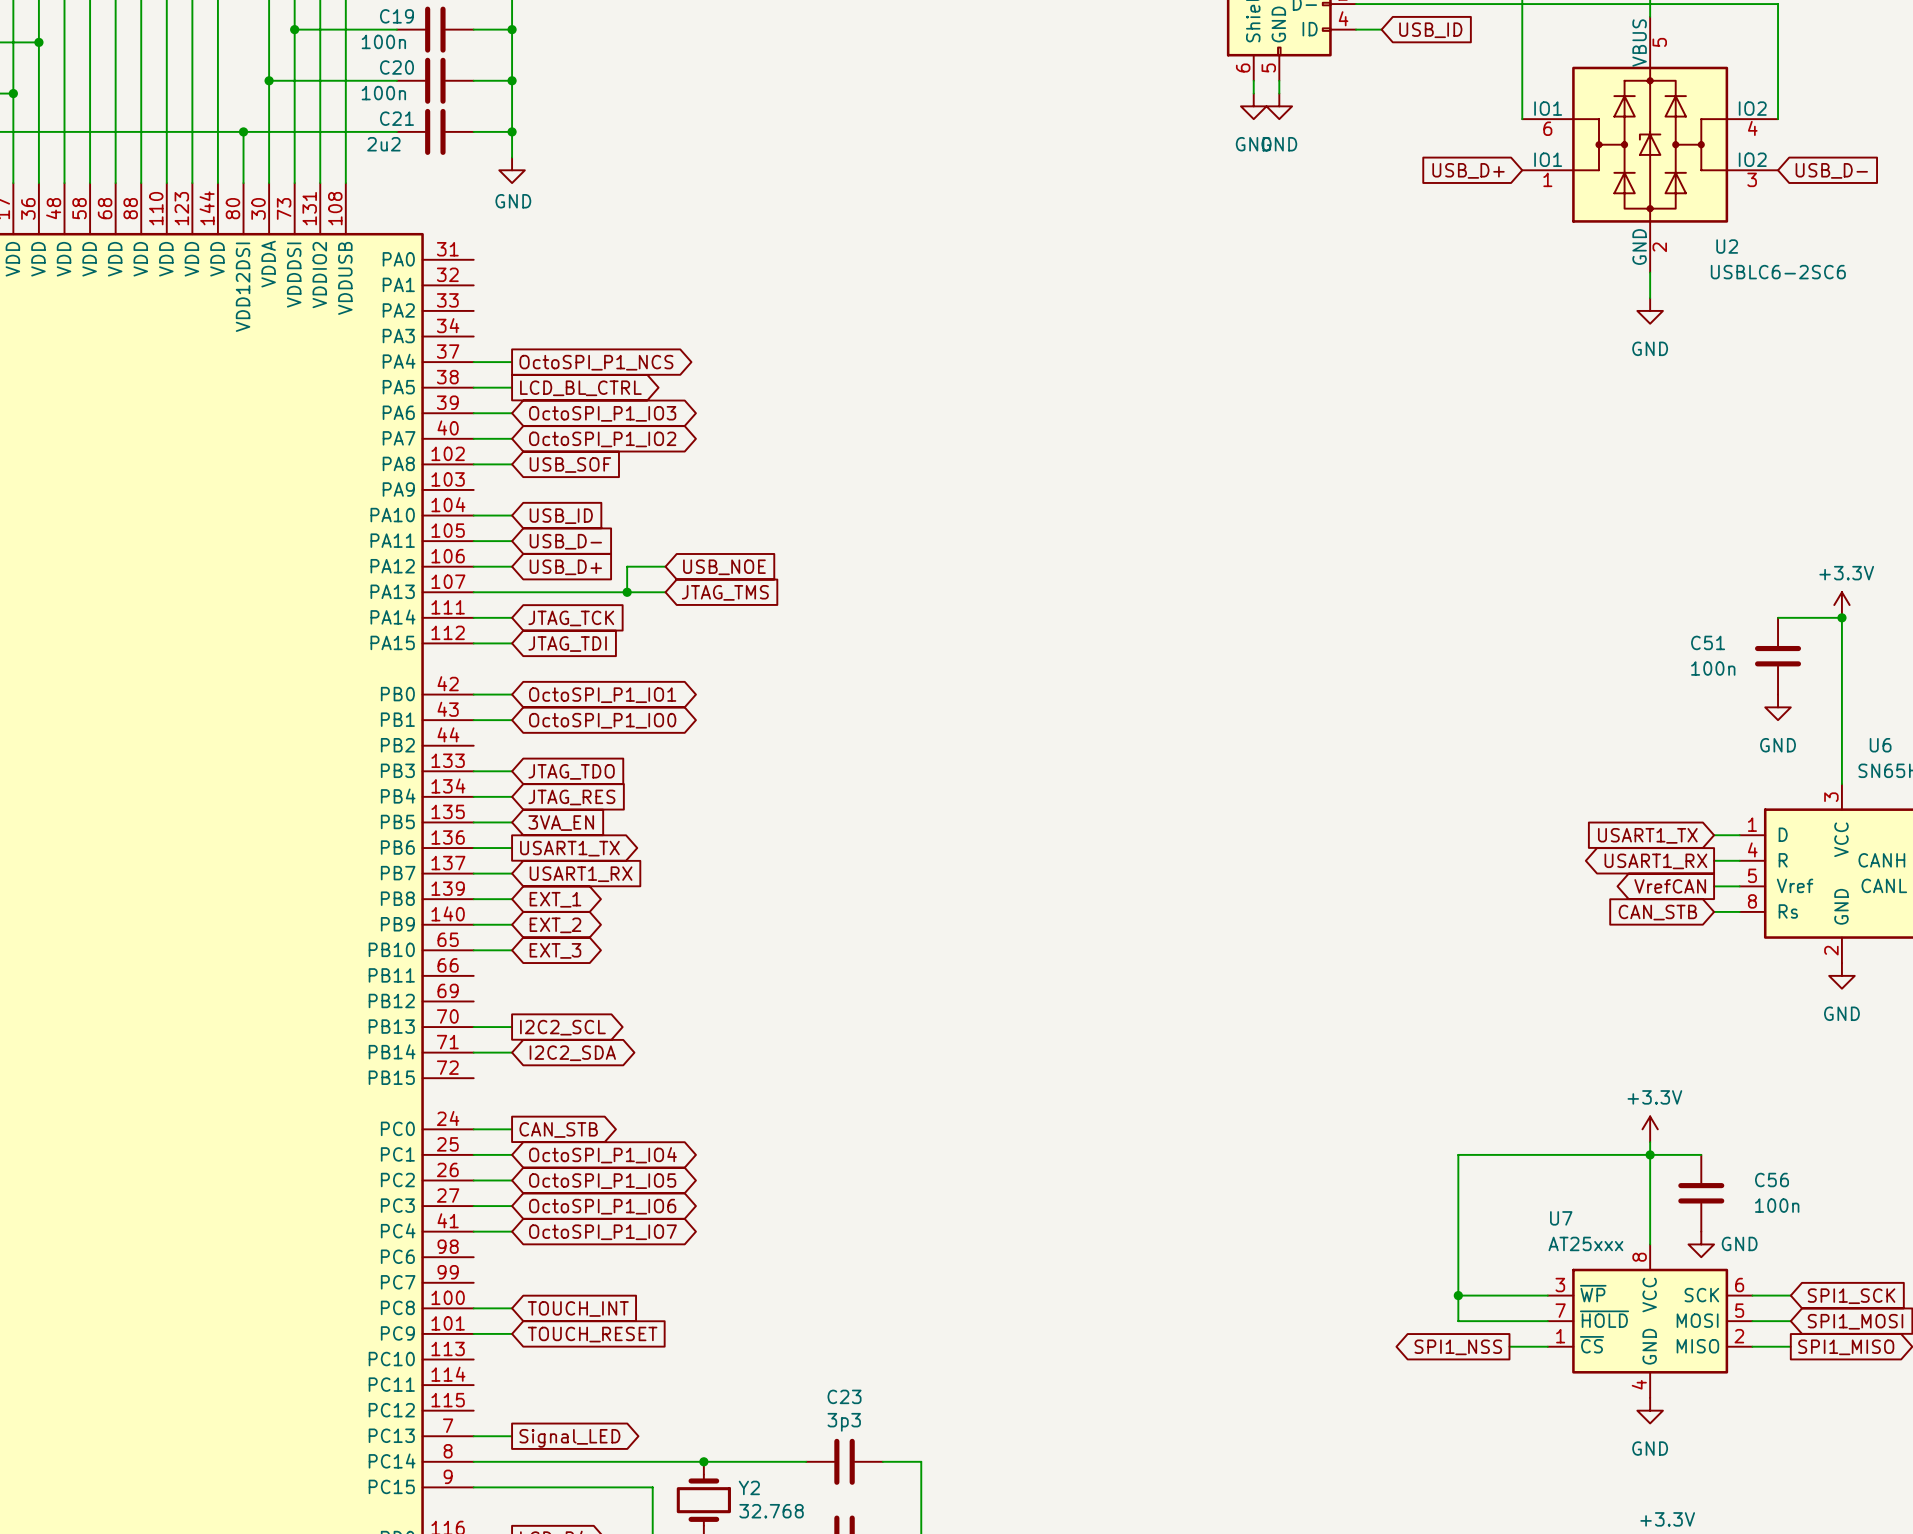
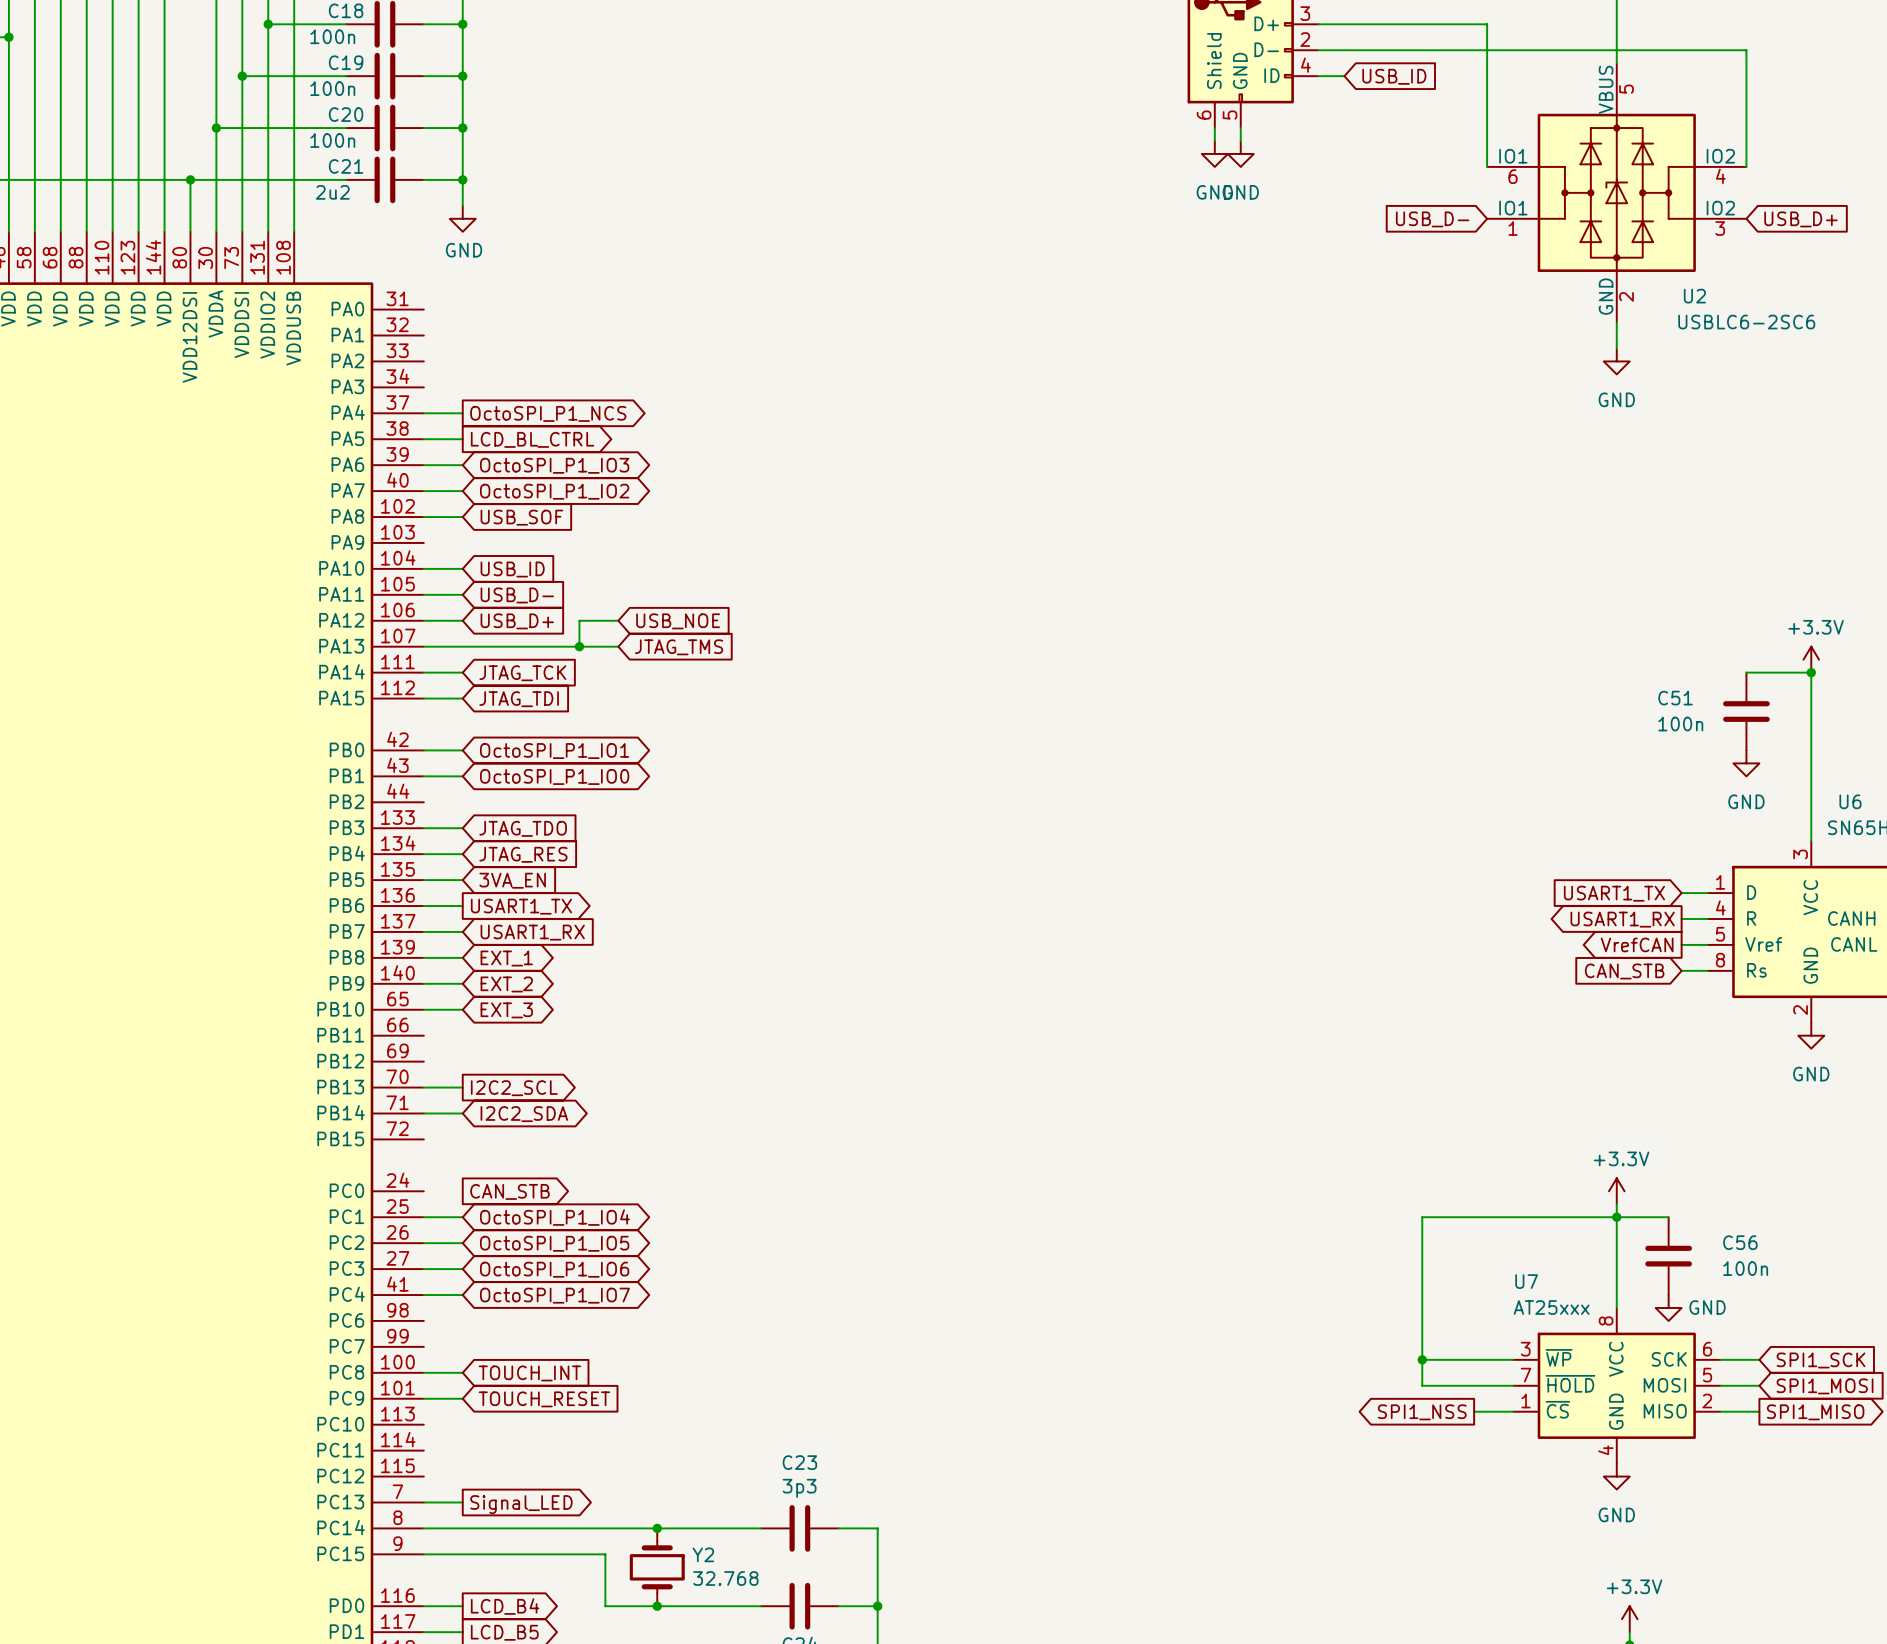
global label: USB_D+ (1468, 170) -> USB_D- (1432, 219)
global label: USB_D- (1831, 170) -> USB_D+ (1800, 219)
wire: (473, 1129) (512, 1129) -> none

